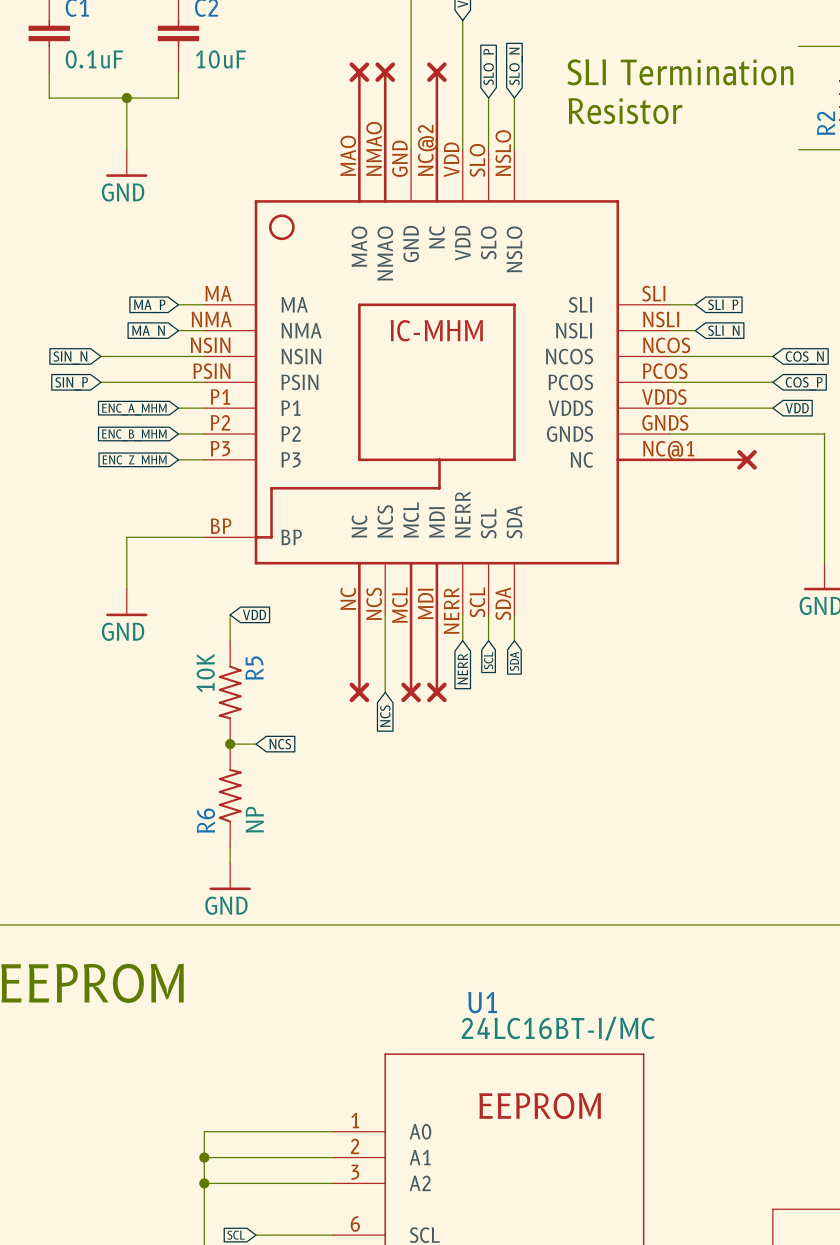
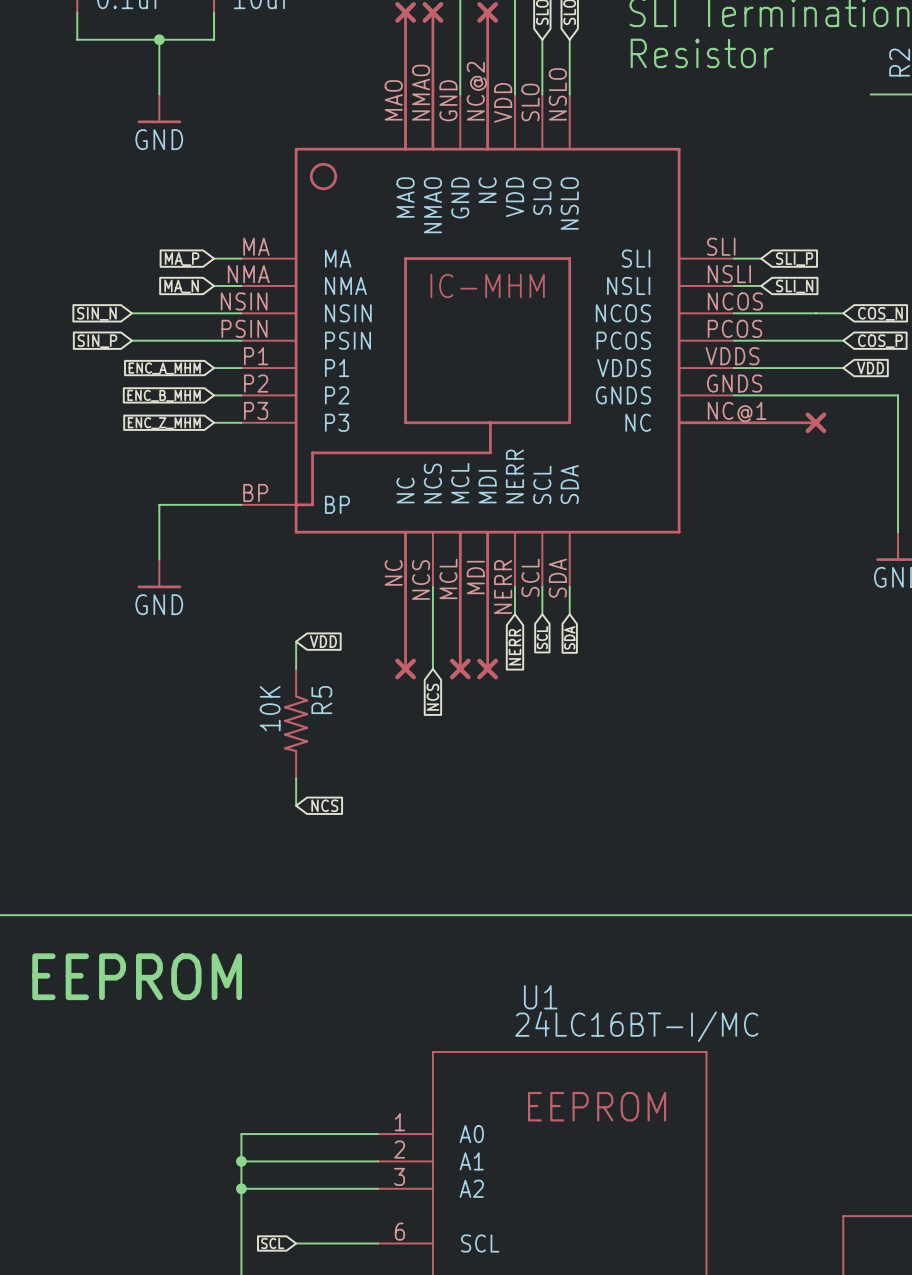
wire: (230, 614) (230, 640) -> (296, 641) (296, 668)
global label position: VDD (254, 614) -> VDD (323, 641)
R5 position: (230, 692) -> (296, 723)
wire: (230, 744) (256, 744) -> none
junction: (230, 744) -> none
global label position: NCS (280, 744) -> NCS (324, 805)
R6: NP (230, 795) -> none
wire: none -> (296, 778) (296, 805)
wire: (230, 847) (230, 862) -> none
power symbol: GND (230, 876) -> none

